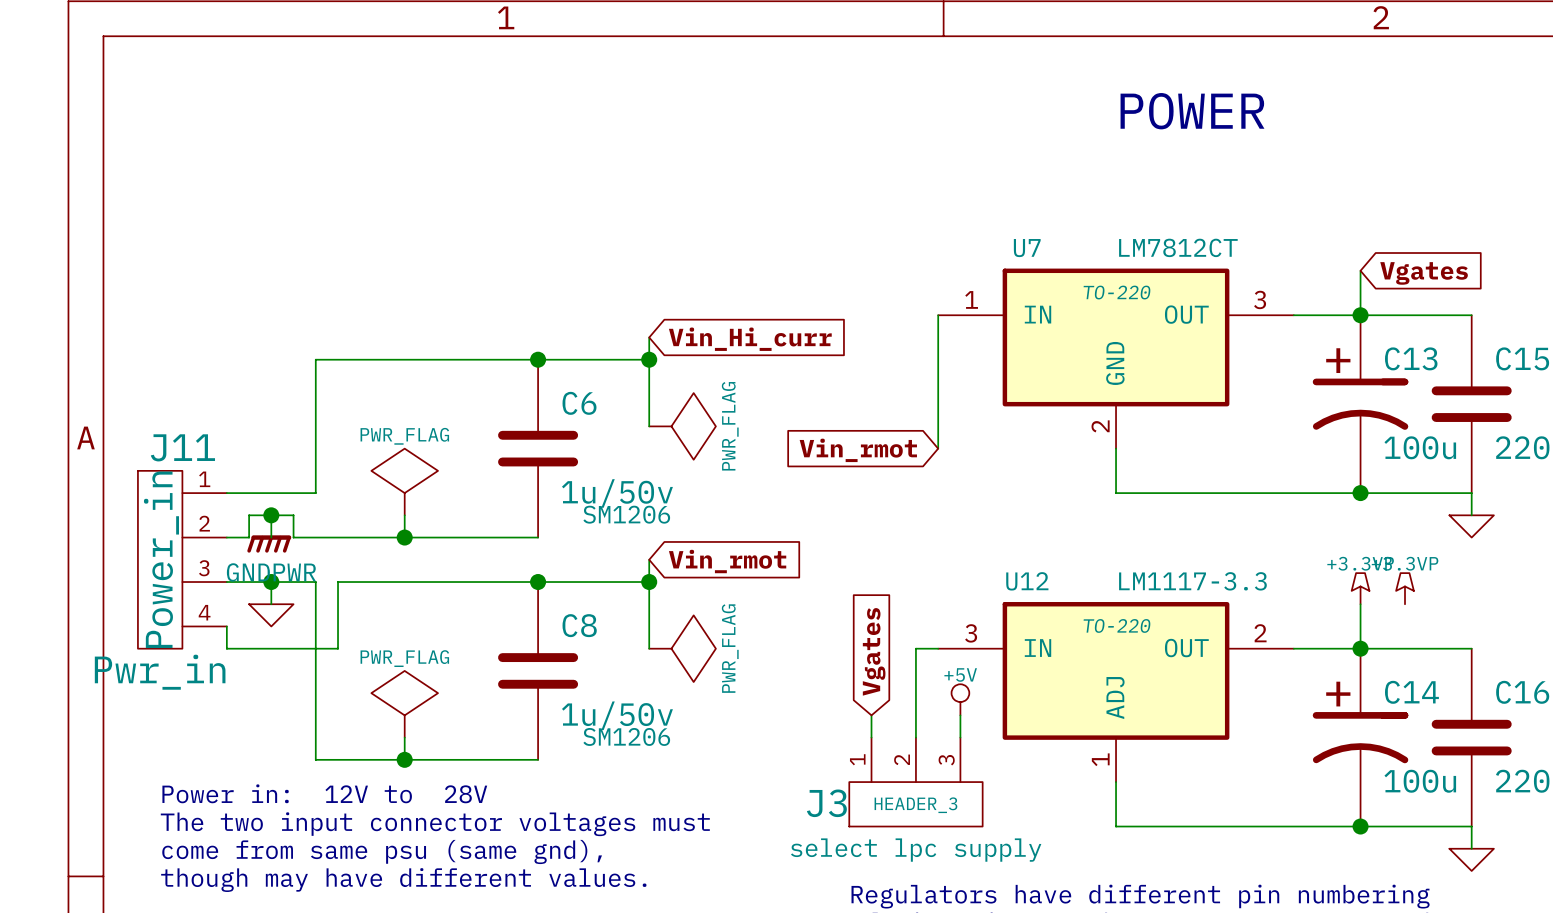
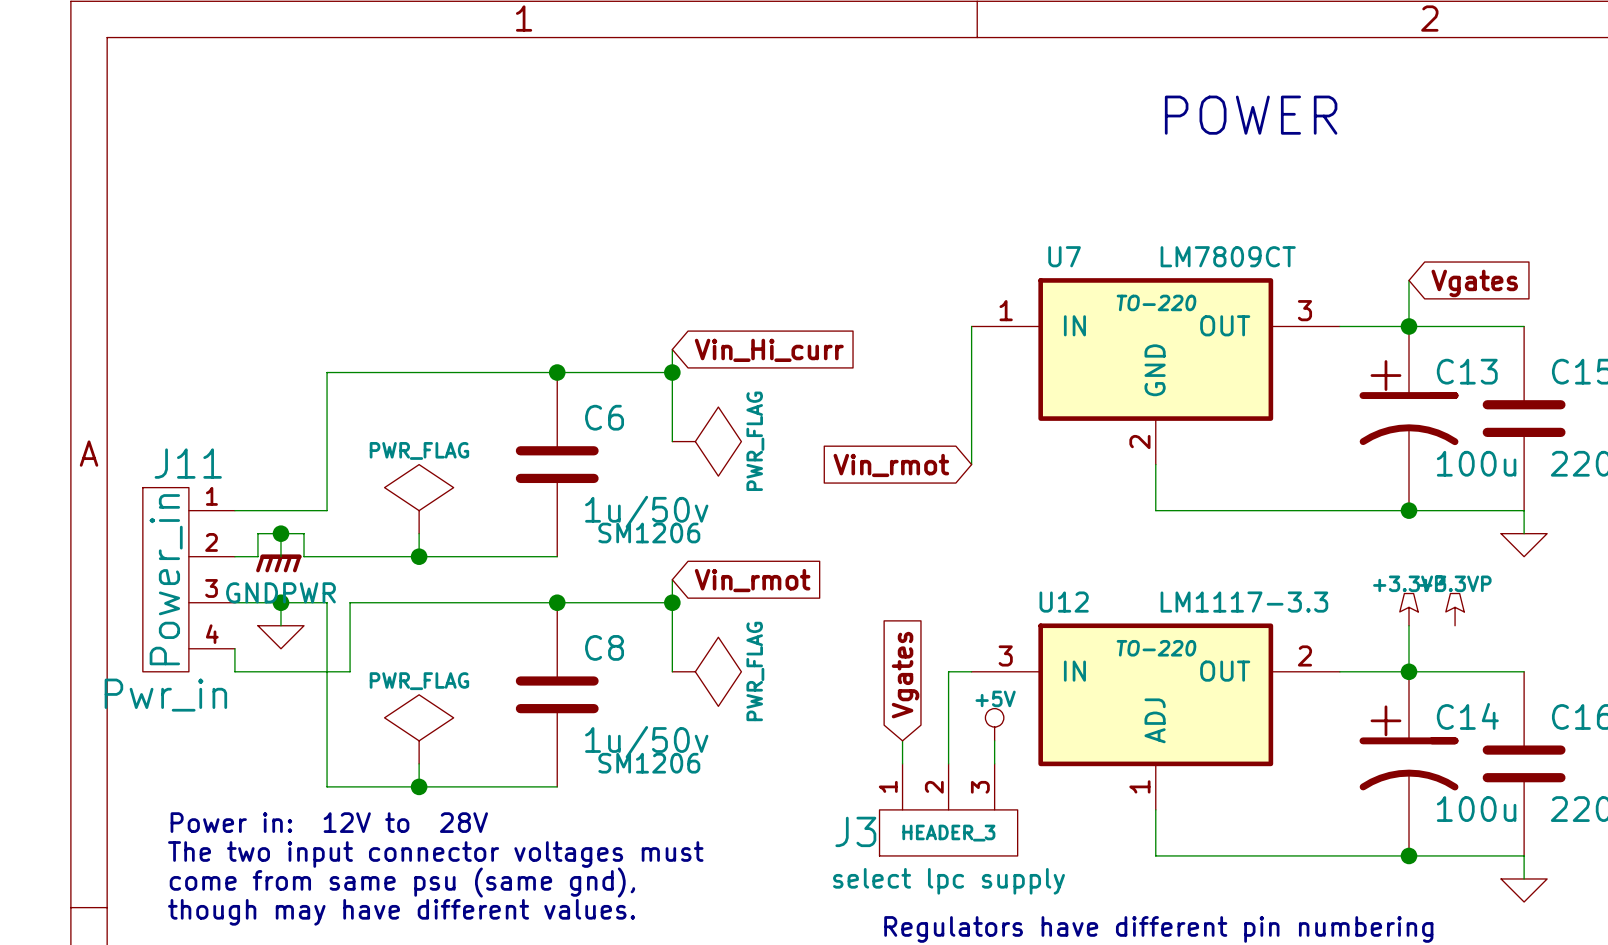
U7 value: LM7812CT (1178, 247) -> LM7809CT (1228, 256)

